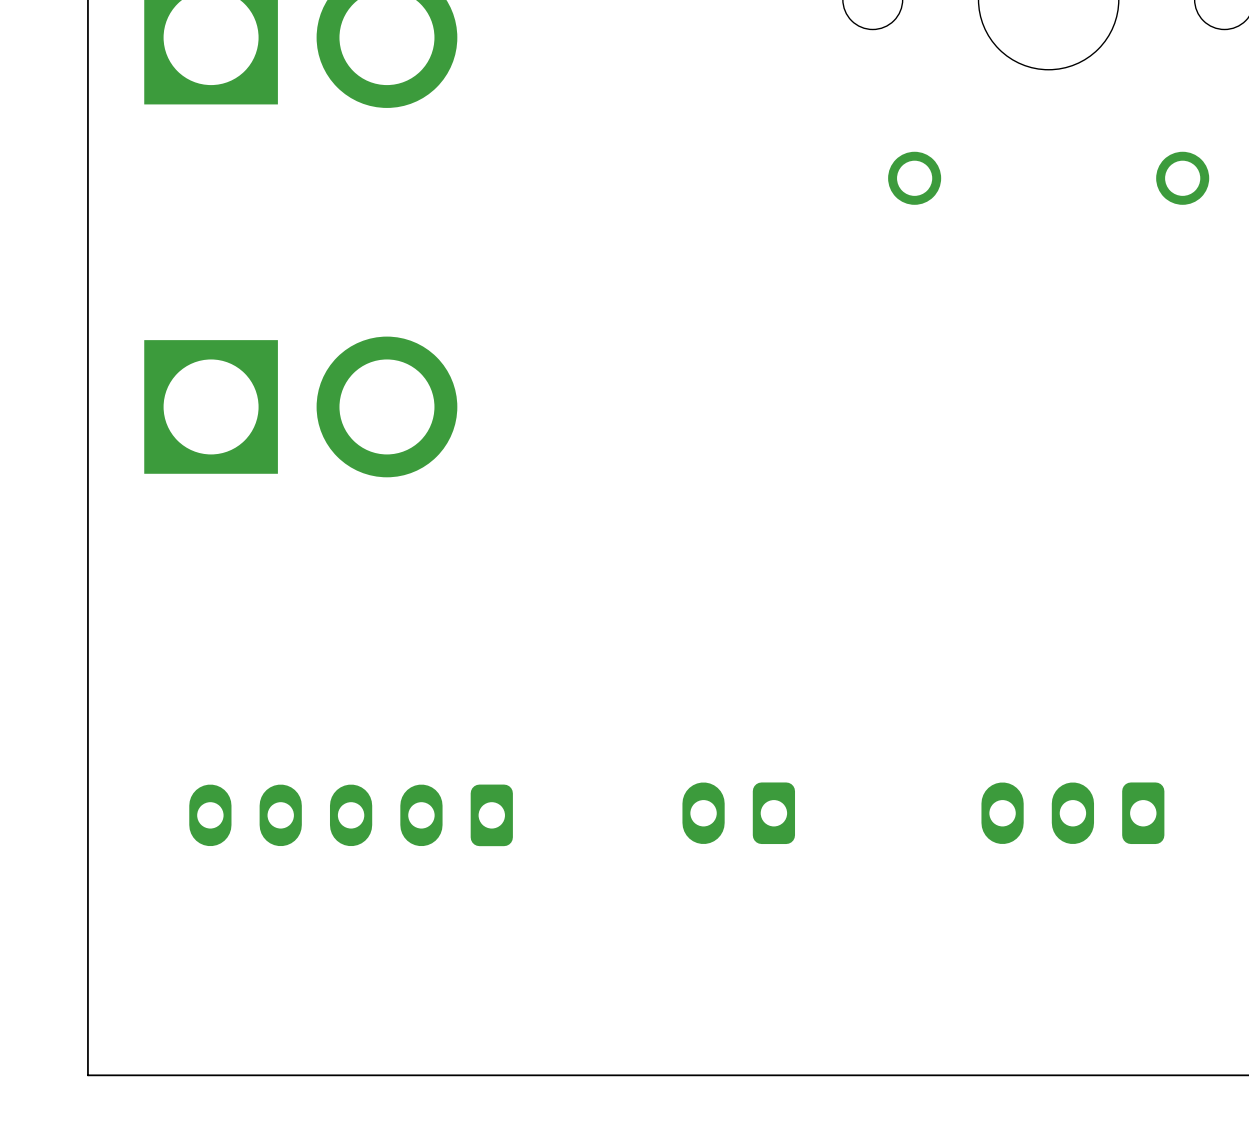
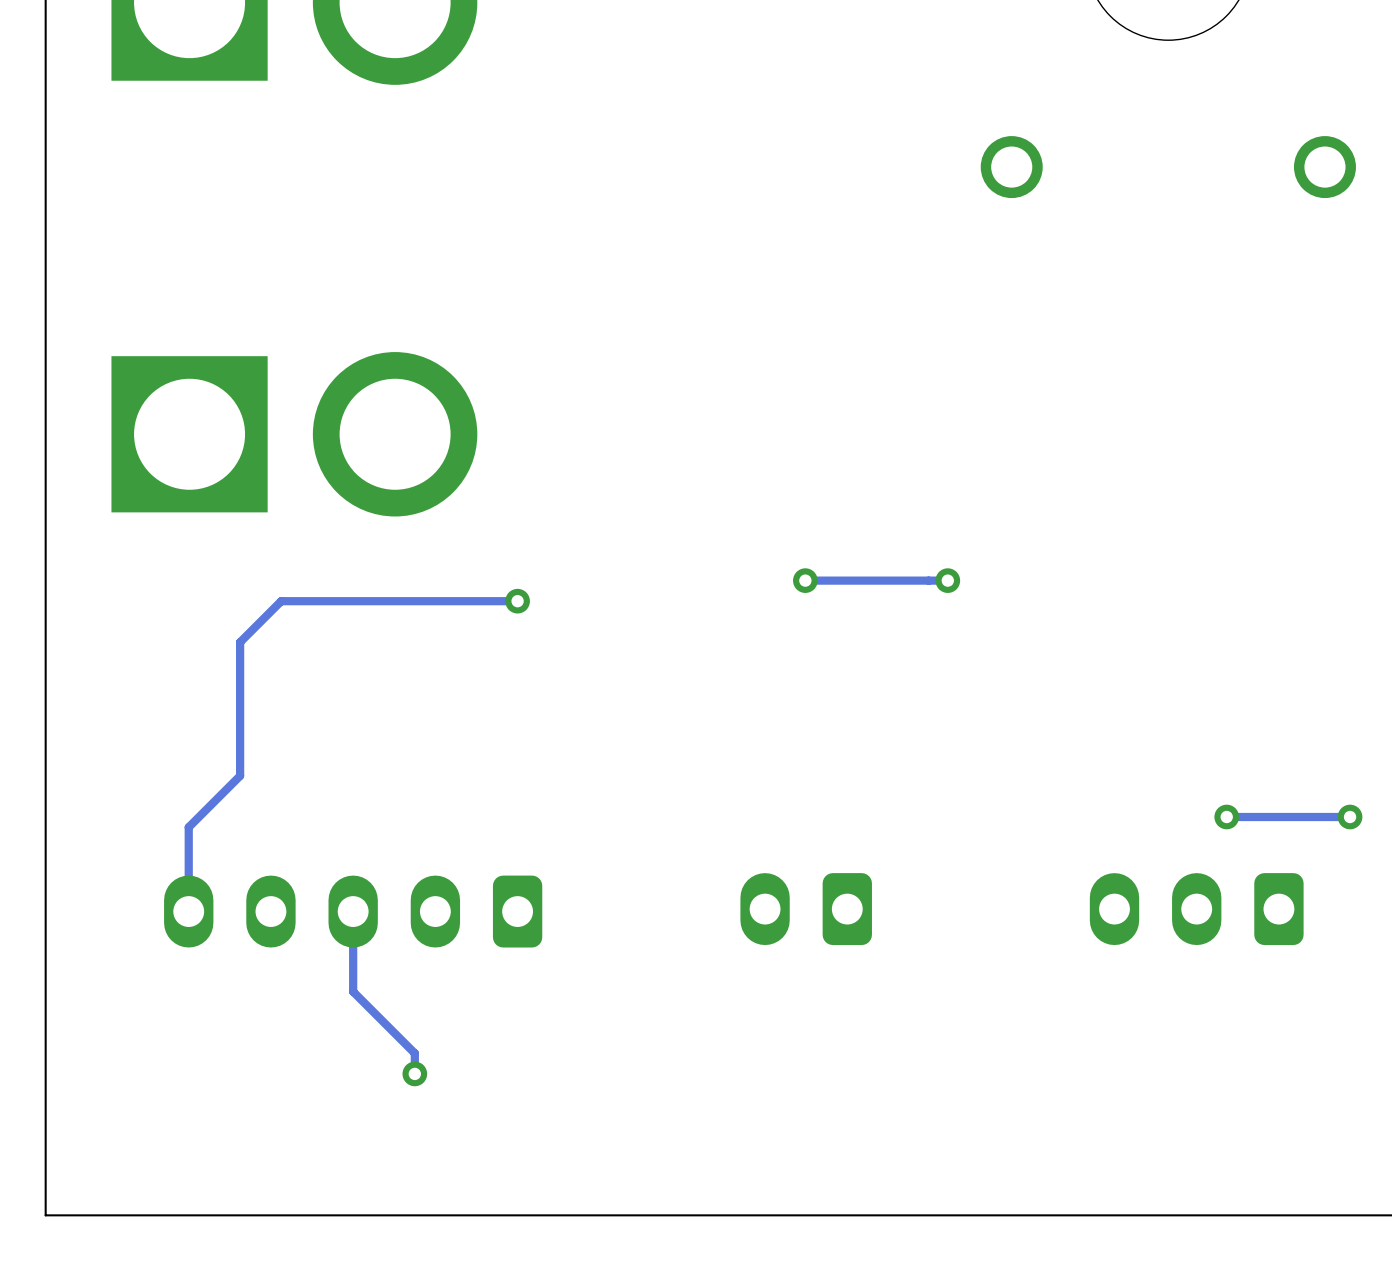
via: none -> (805, 580)
track: none -> (947, 580) (805, 580)
via: none -> (947, 580)
track: none -> (517, 601) (281, 601) (240, 642) (240, 775) (188, 827) (188, 911)
via: none -> (517, 601)
via: none -> (1226, 817)
track: none -> (1350, 817) (1226, 817)
via: none -> (1350, 817)
track: none -> (353, 911) (353, 991) (414, 1053) (414, 1073)
via: none -> (414, 1073)

